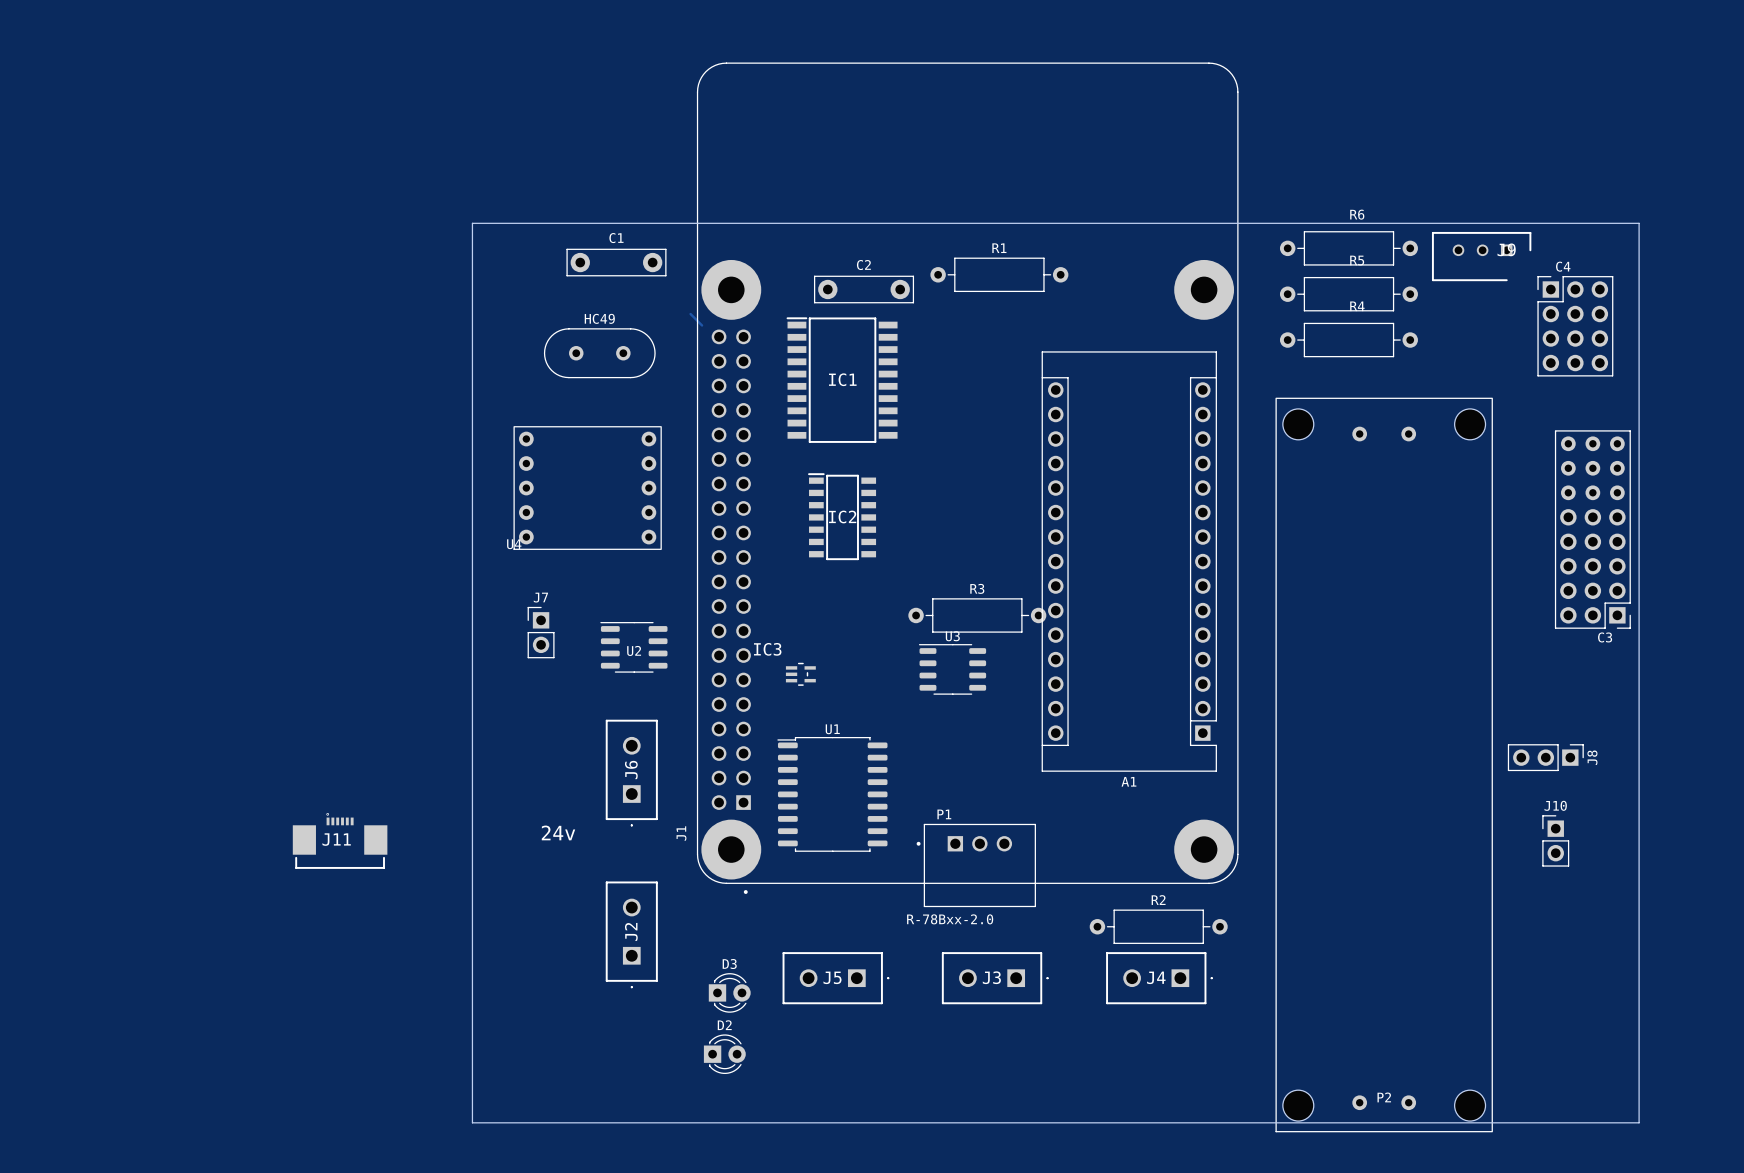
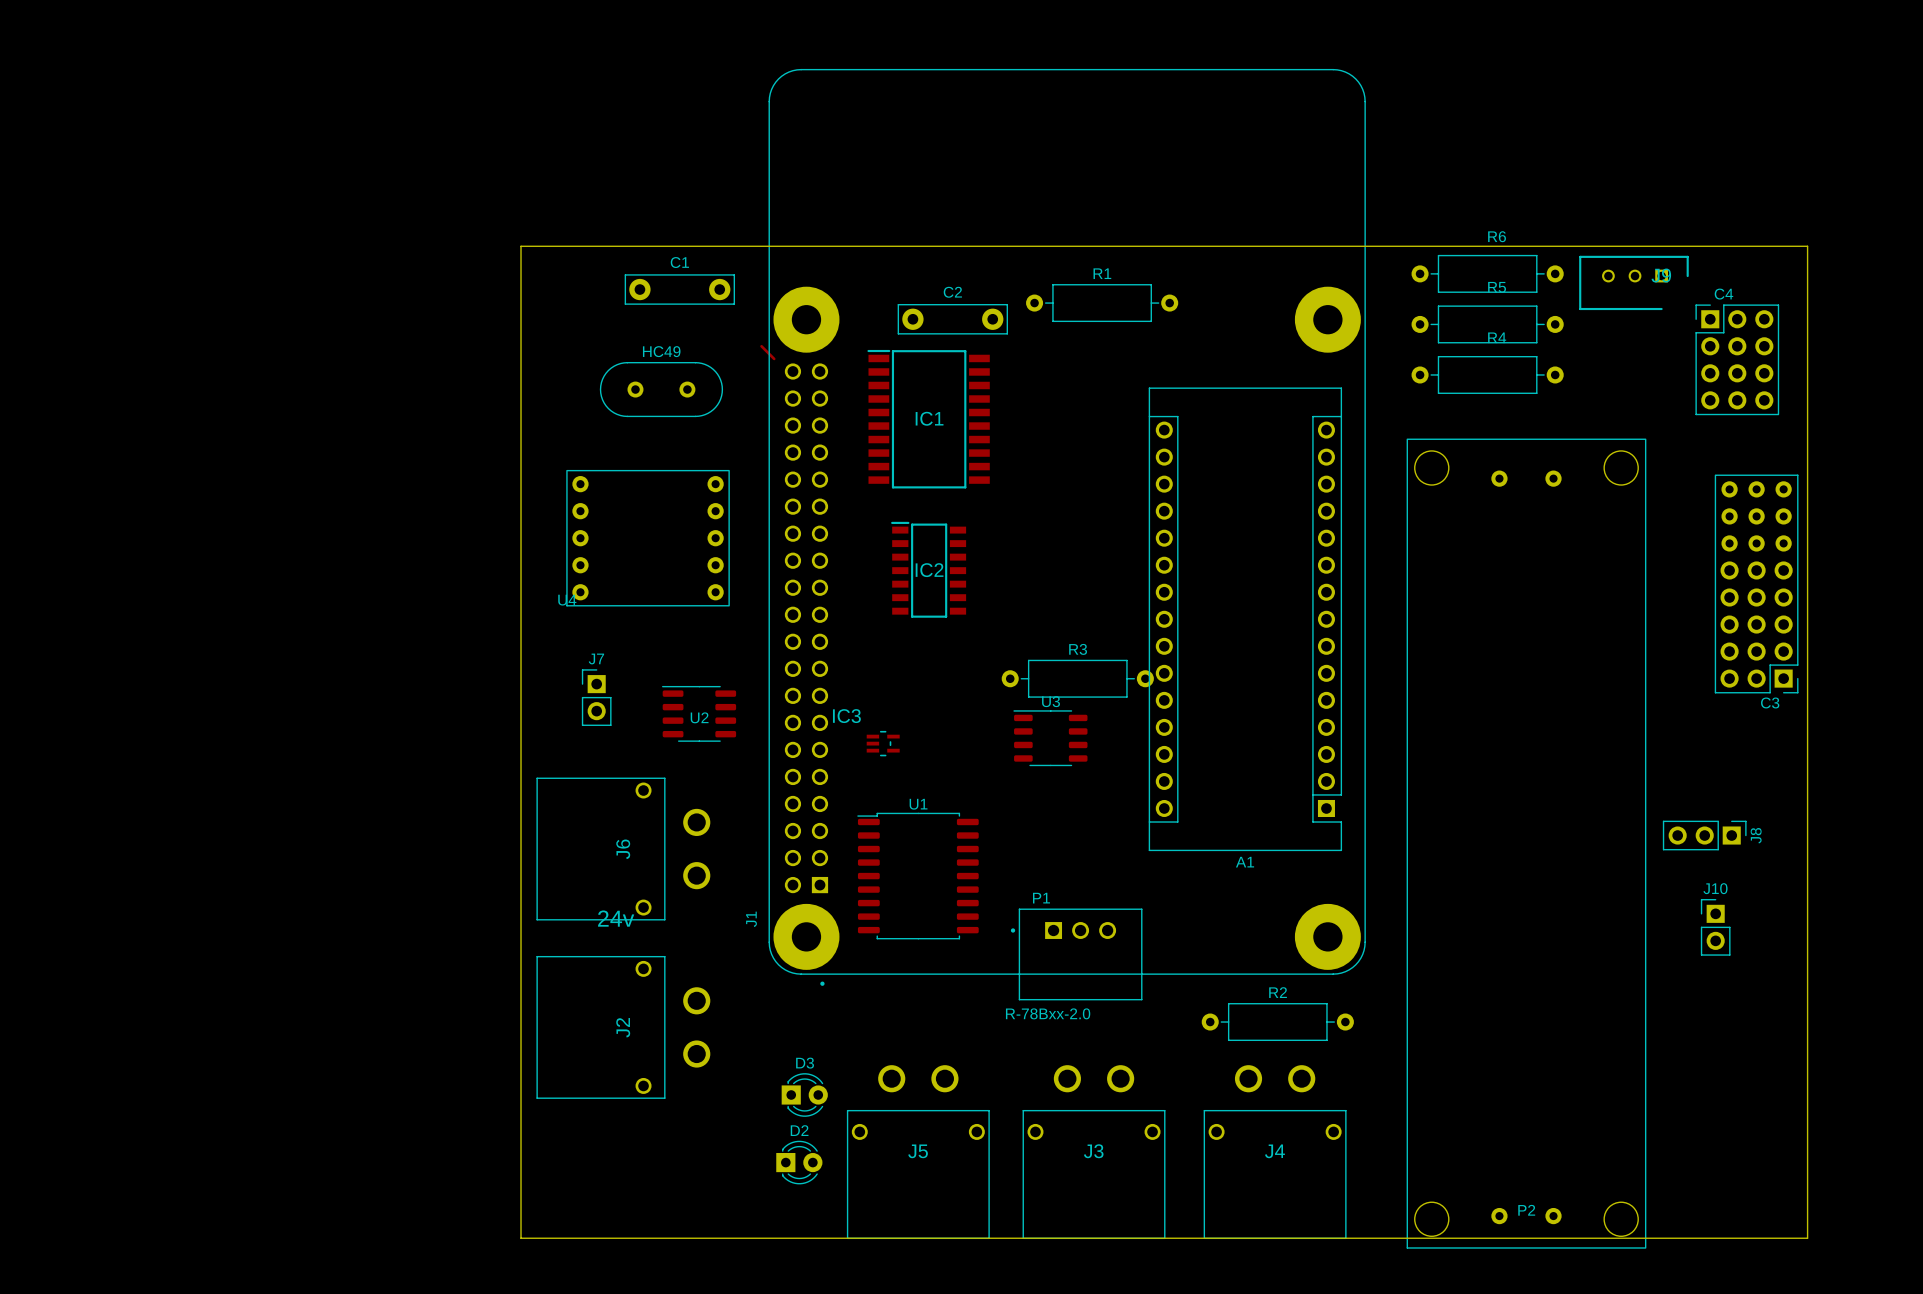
J6 footprint: [605, 719, 658, 827] -> [536, 777, 711, 921]
J11: (340, 840) -> none
J2 footprint: [605, 881, 658, 989] -> [536, 956, 711, 1099]
J5 footprint: [782, 952, 890, 1005] -> [847, 1065, 990, 1239]
J3 footprint: [941, 952, 1049, 1005] -> [1022, 1065, 1166, 1239]
J4 footprint: [1106, 952, 1213, 1005] -> [1203, 1065, 1347, 1239]

